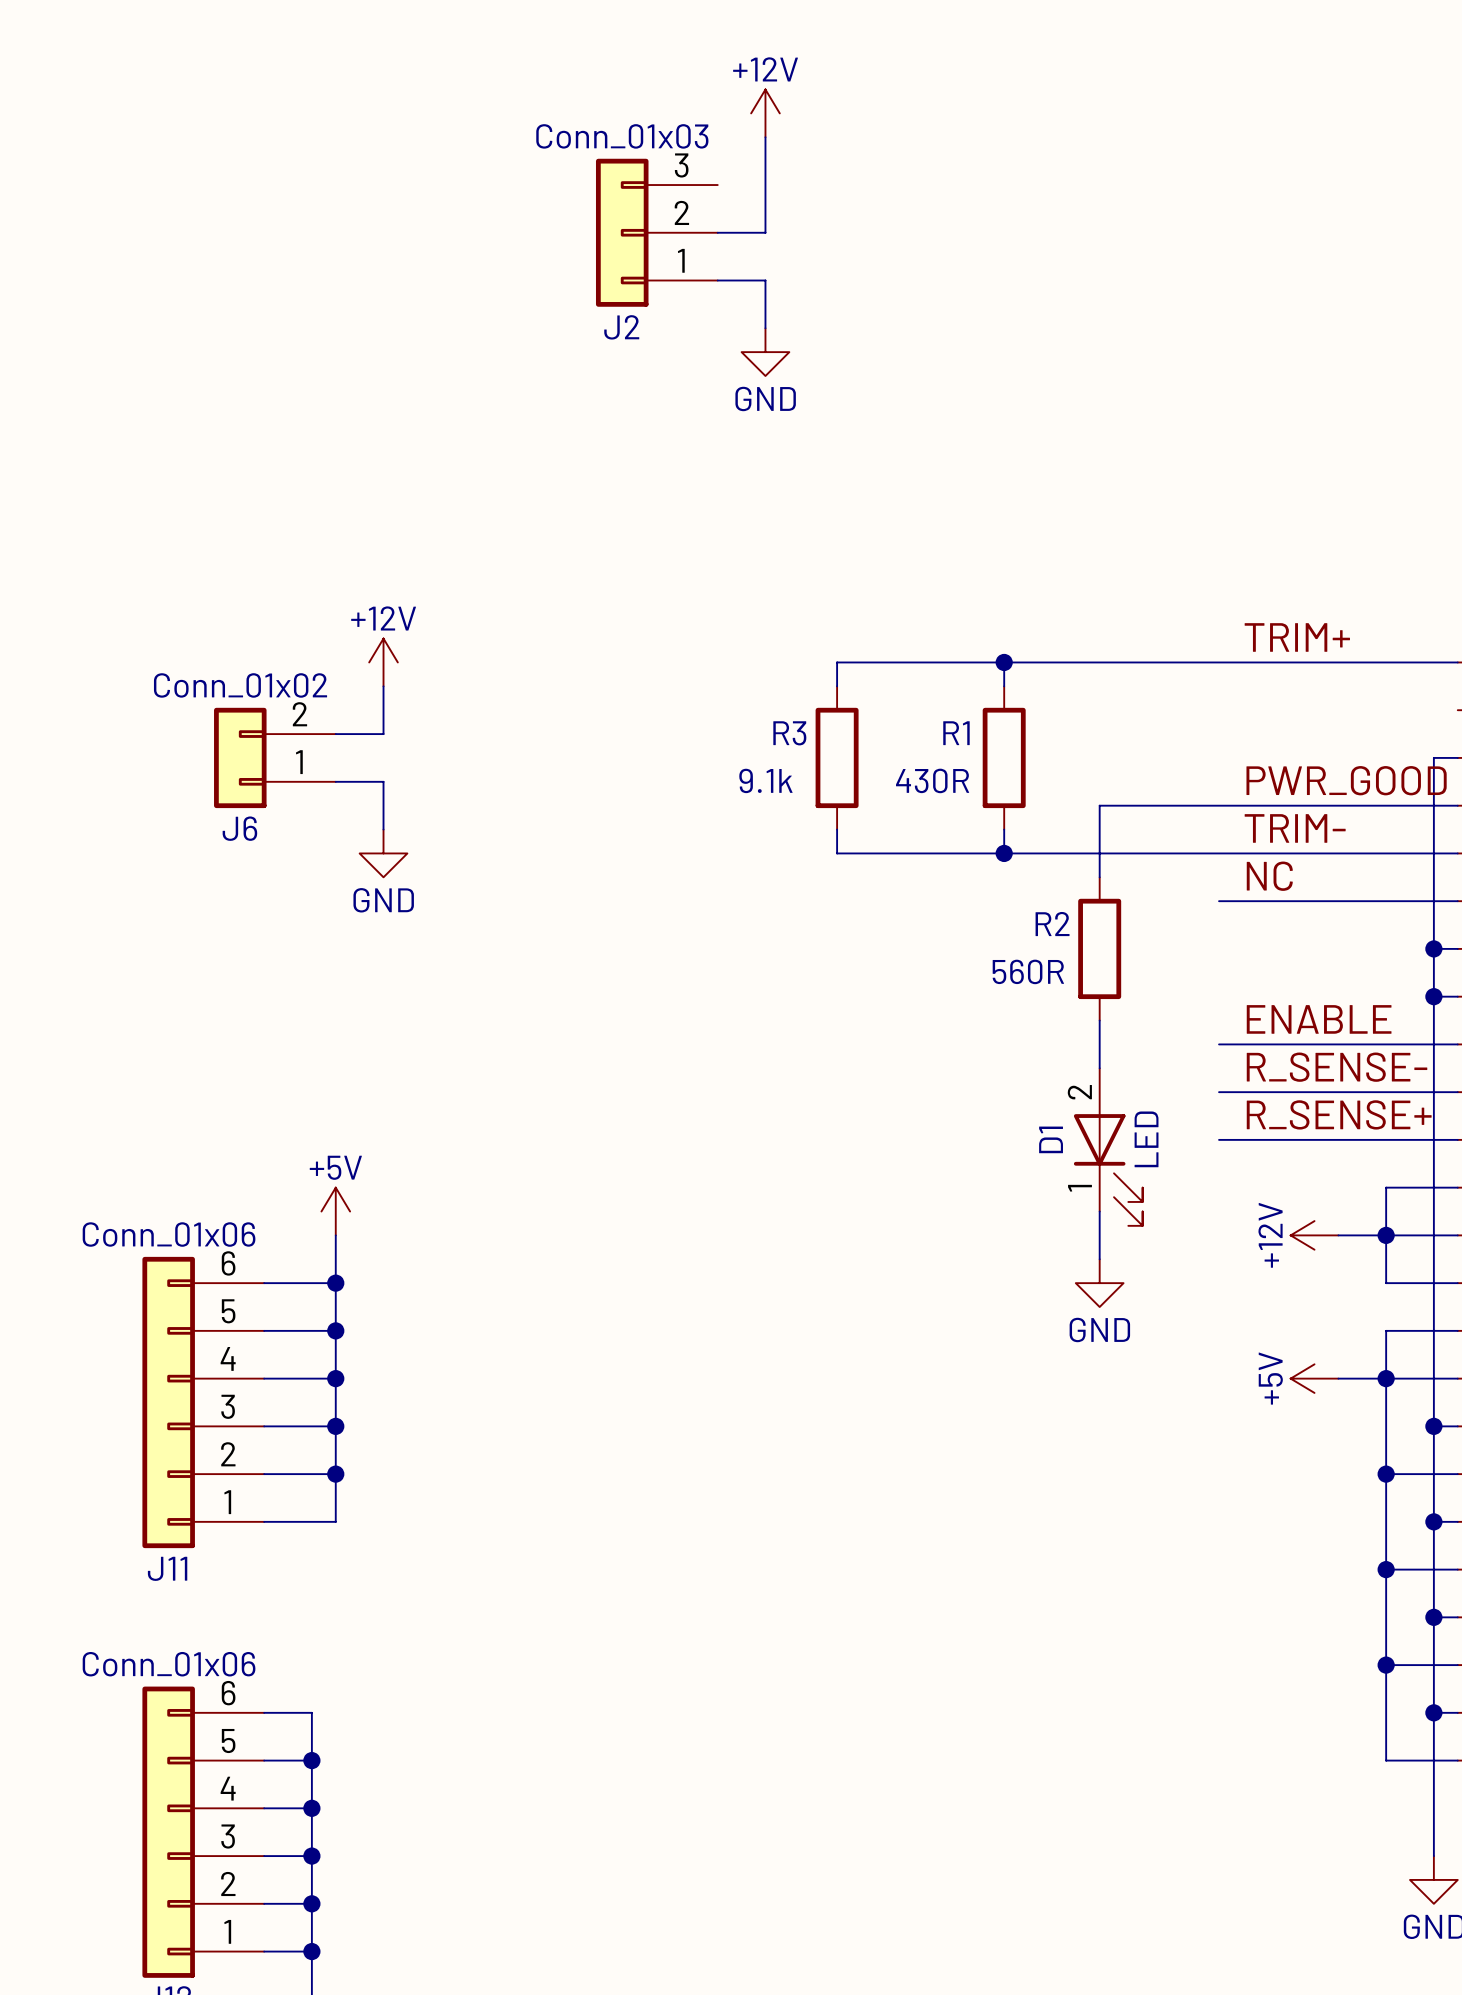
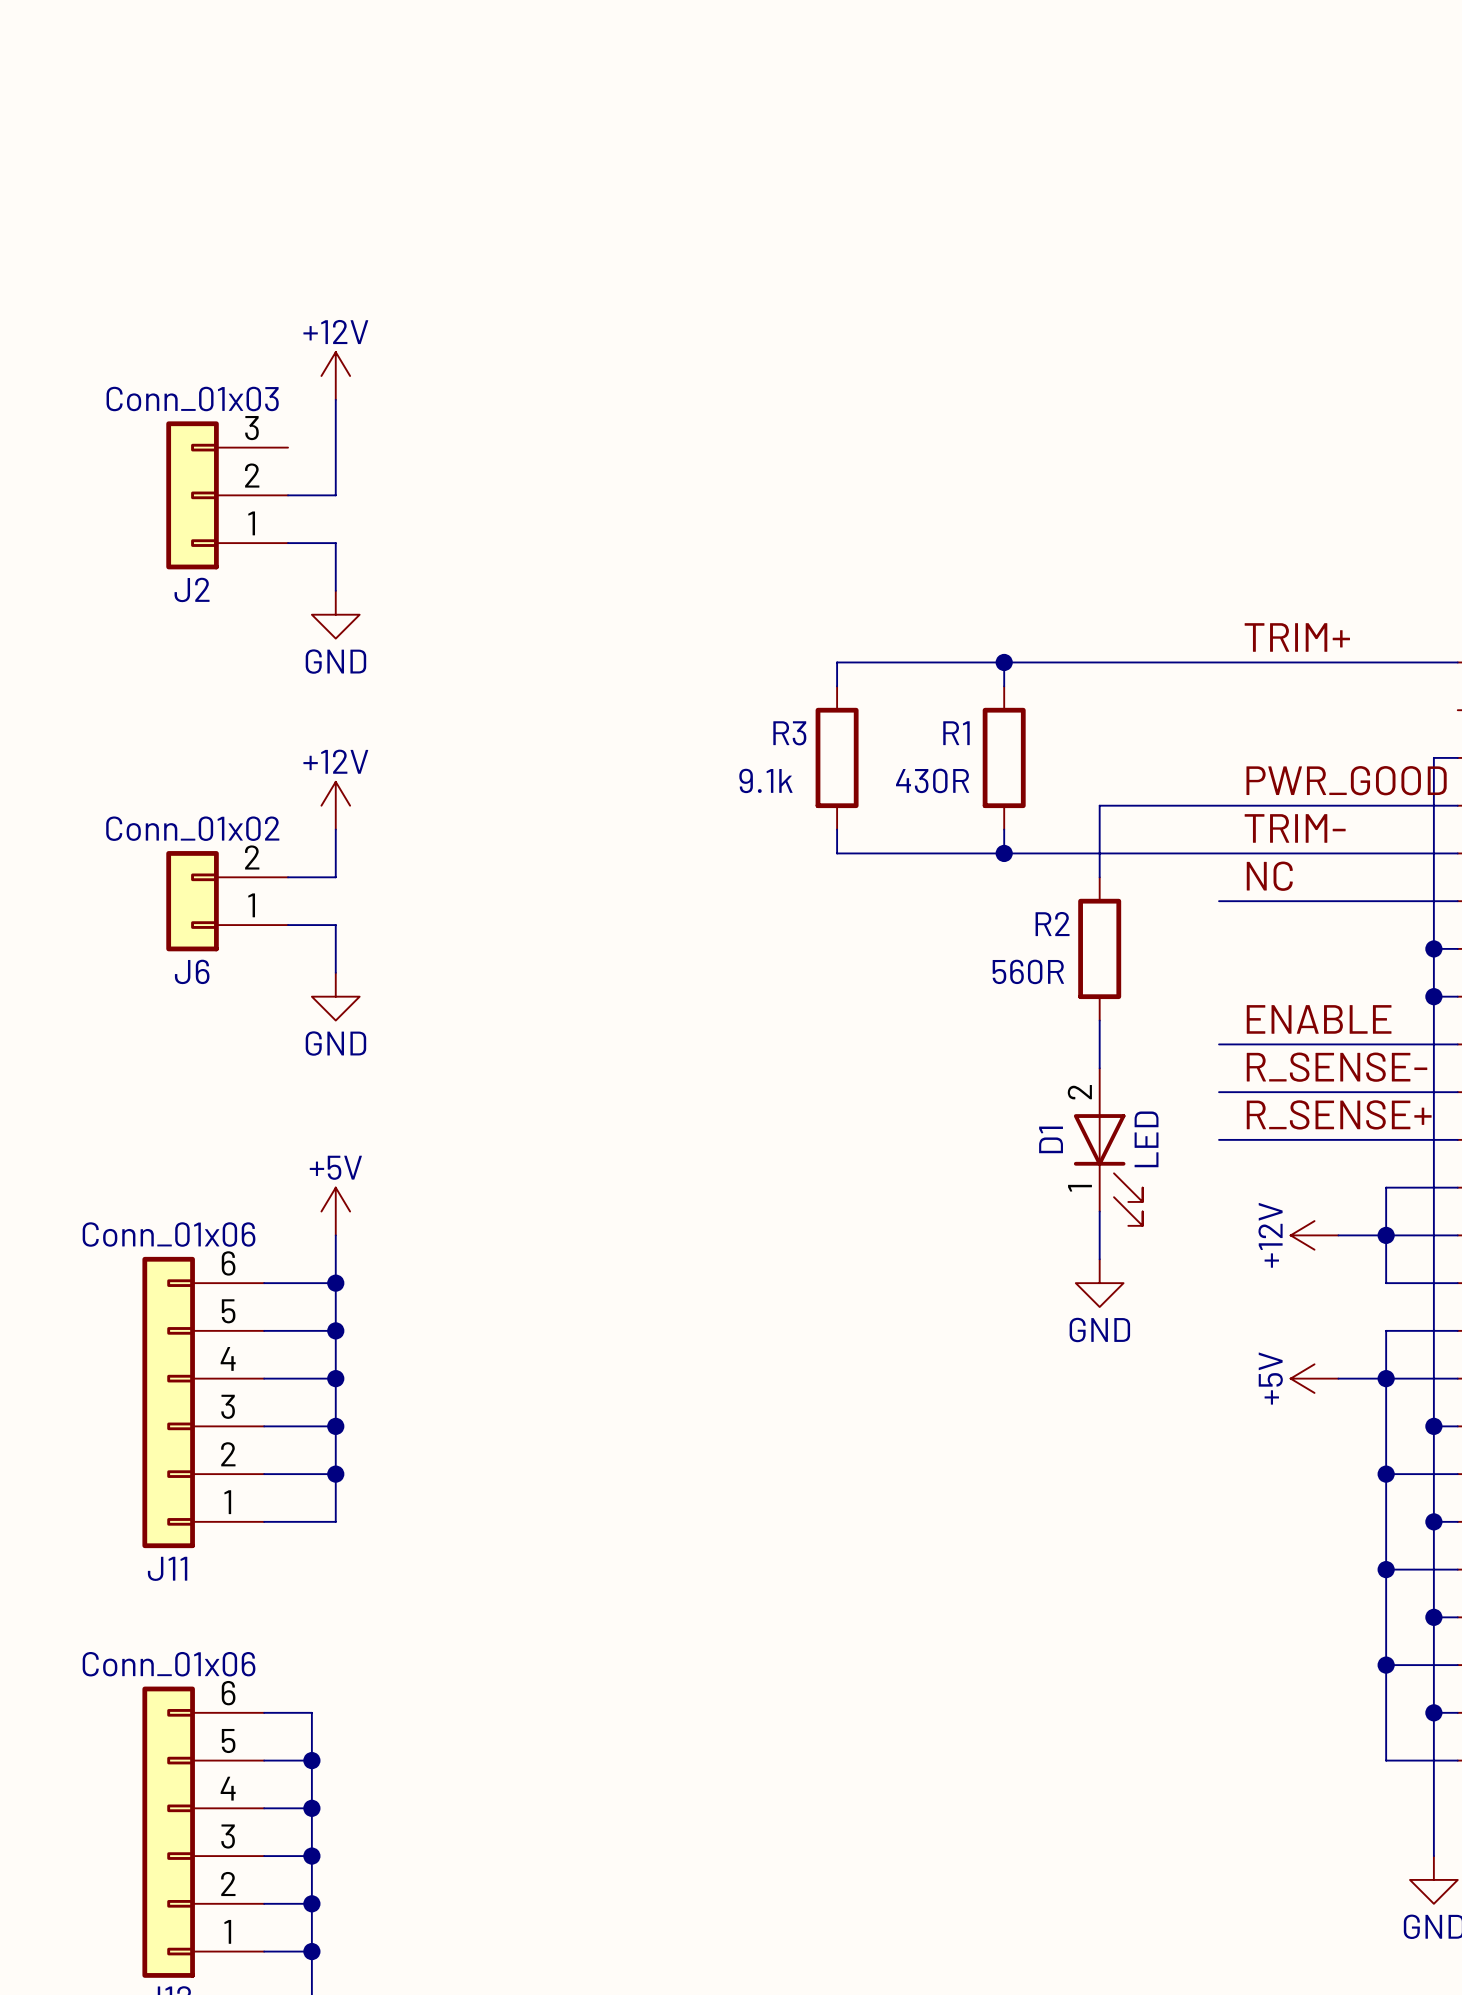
power symbol: +12V (765, 113) -> none
wire: (765, 137) (765, 232) (717, 232) -> none
J2 position: (656, 232) -> (227, 495)
wire: (717, 280) (765, 280) (765, 328) -> none
power symbol: GND (765, 352) -> none
power symbol: none -> +12V (335, 375)
wire: none -> (335, 399) (335, 495) (288, 495)
wire: none -> (288, 543) (335, 543) (335, 590)
power symbol: none -> GND (335, 614)
power symbol: +12V (383, 662) -> none
wire: (383, 686) (383, 734) (335, 734) -> (335, 829) (335, 877) (288, 877)
J6 position: (274, 757) -> (227, 901)
wire: (335, 781) (383, 781) (383, 829) -> (288, 925) (335, 925) (335, 972)
power symbol: none -> +12V (335, 805)
power symbol: GND (383, 853) -> none
power symbol: none -> GND (335, 996)

